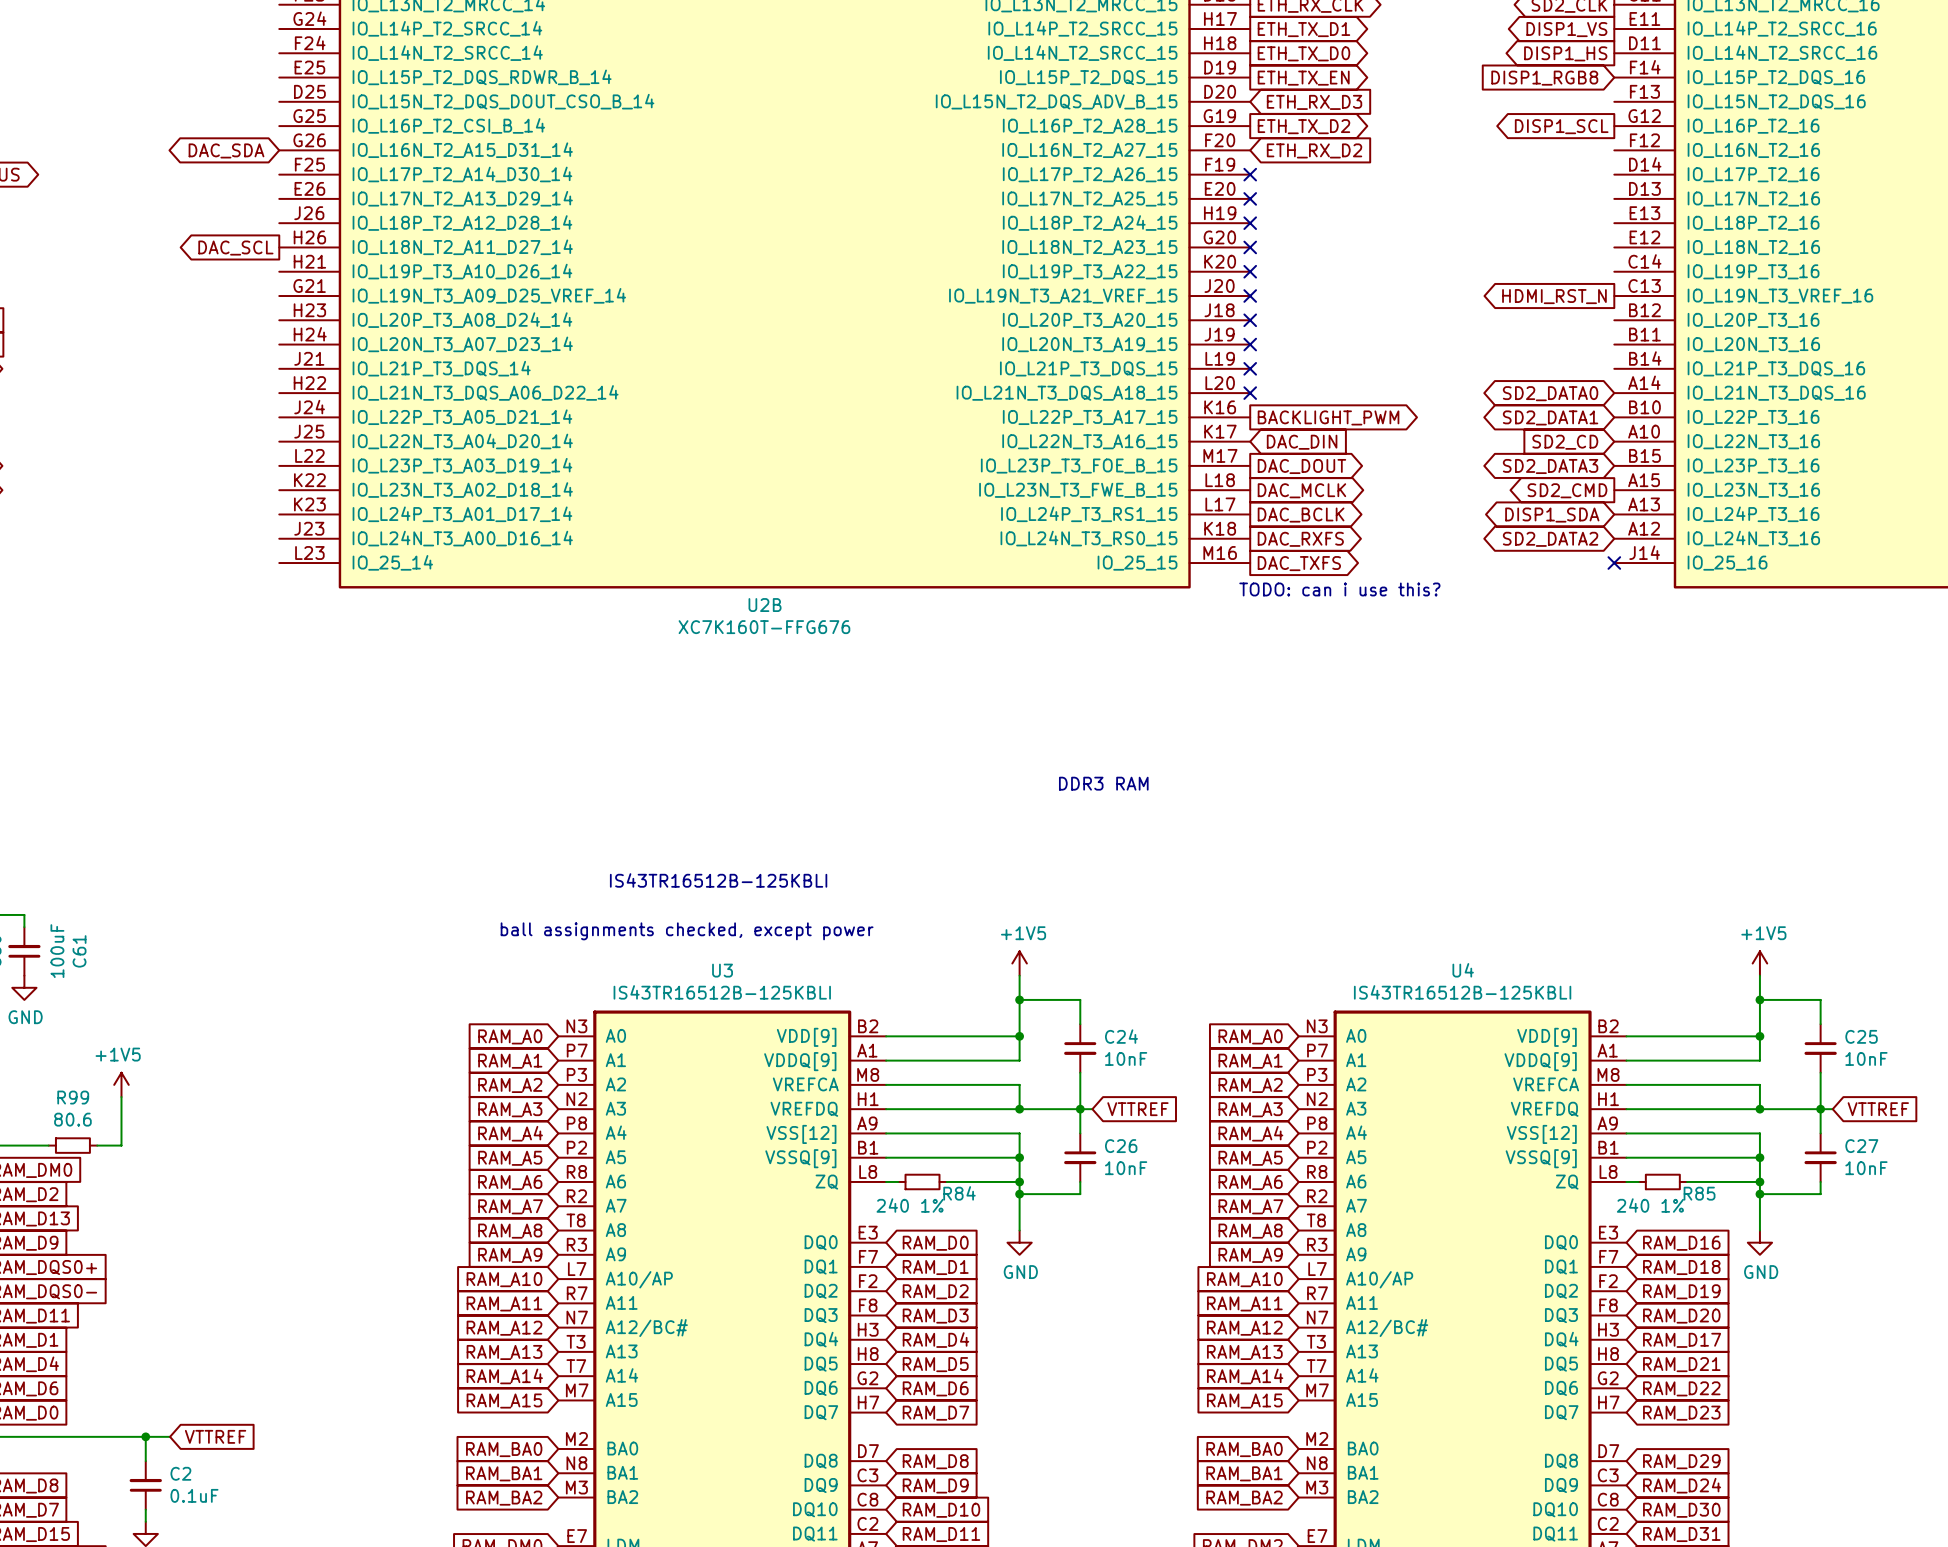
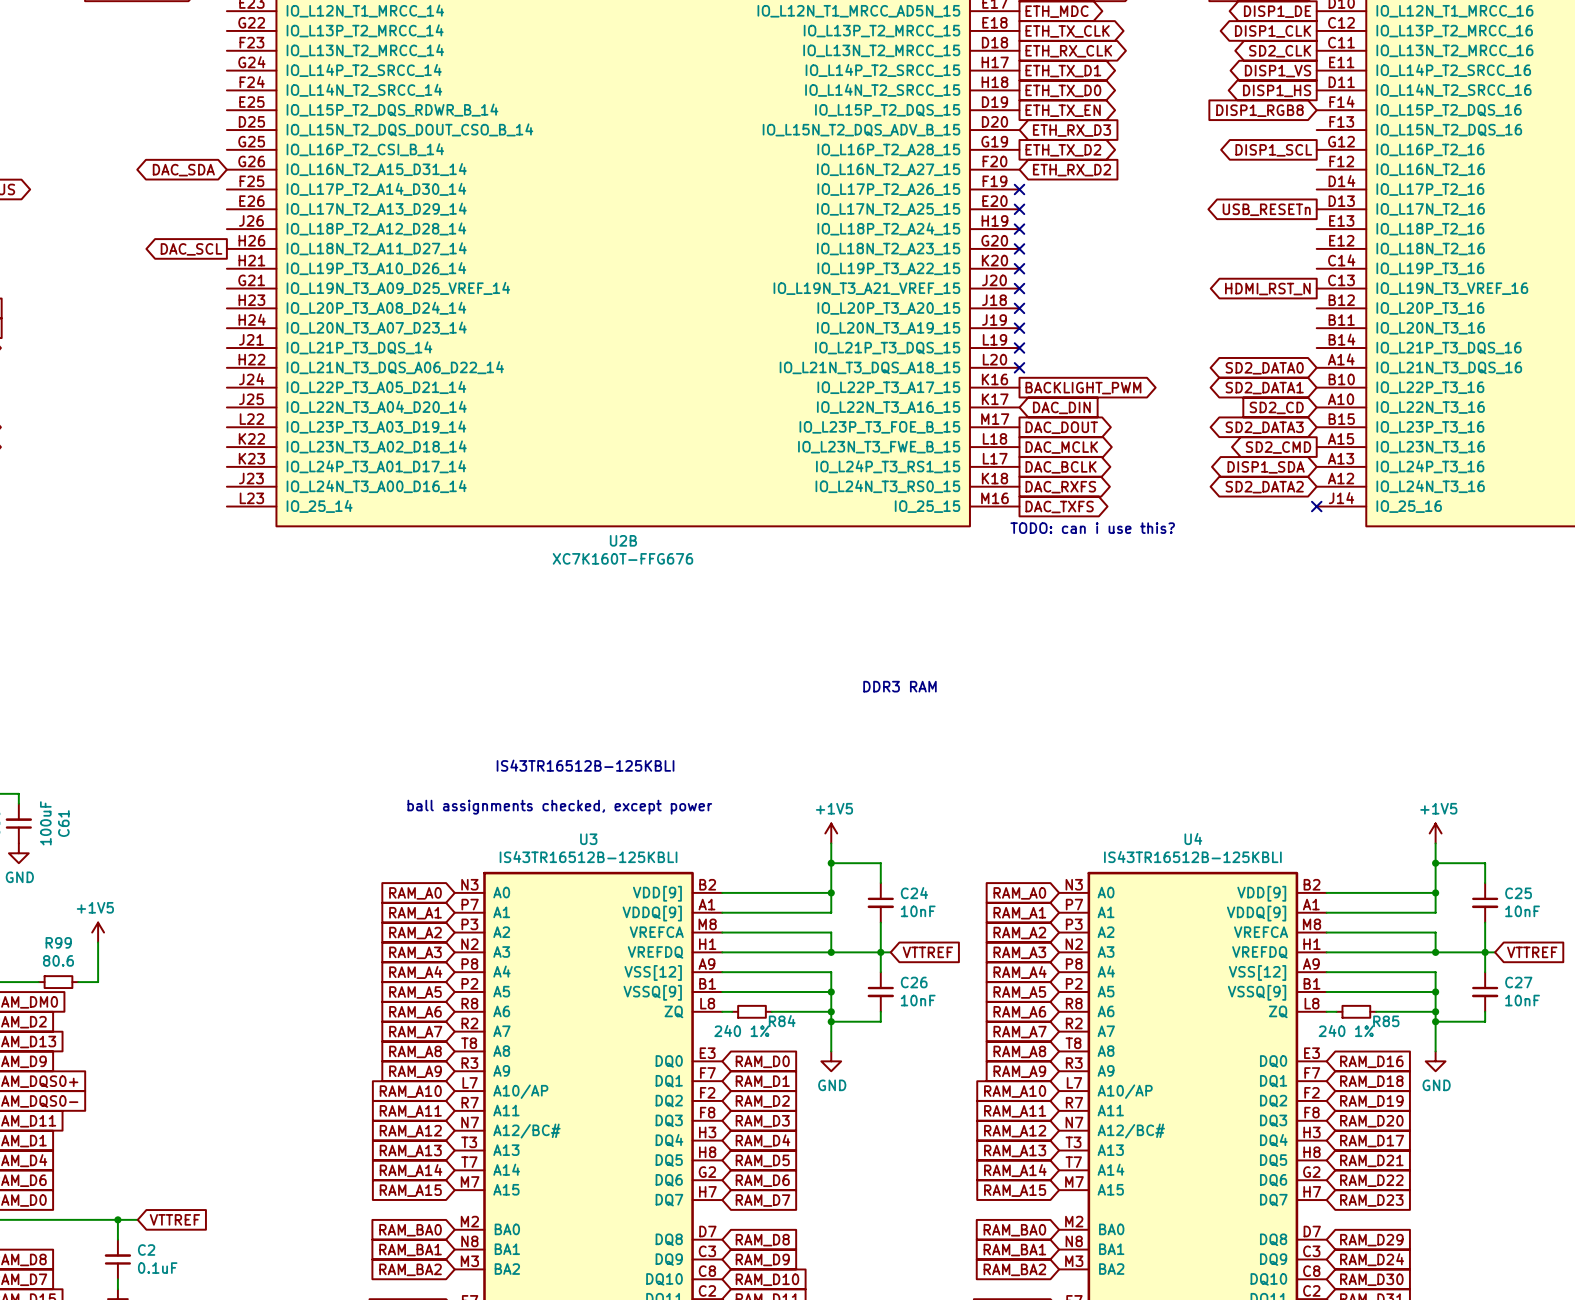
global label: none -> USB_RESETn (1266, 209)

